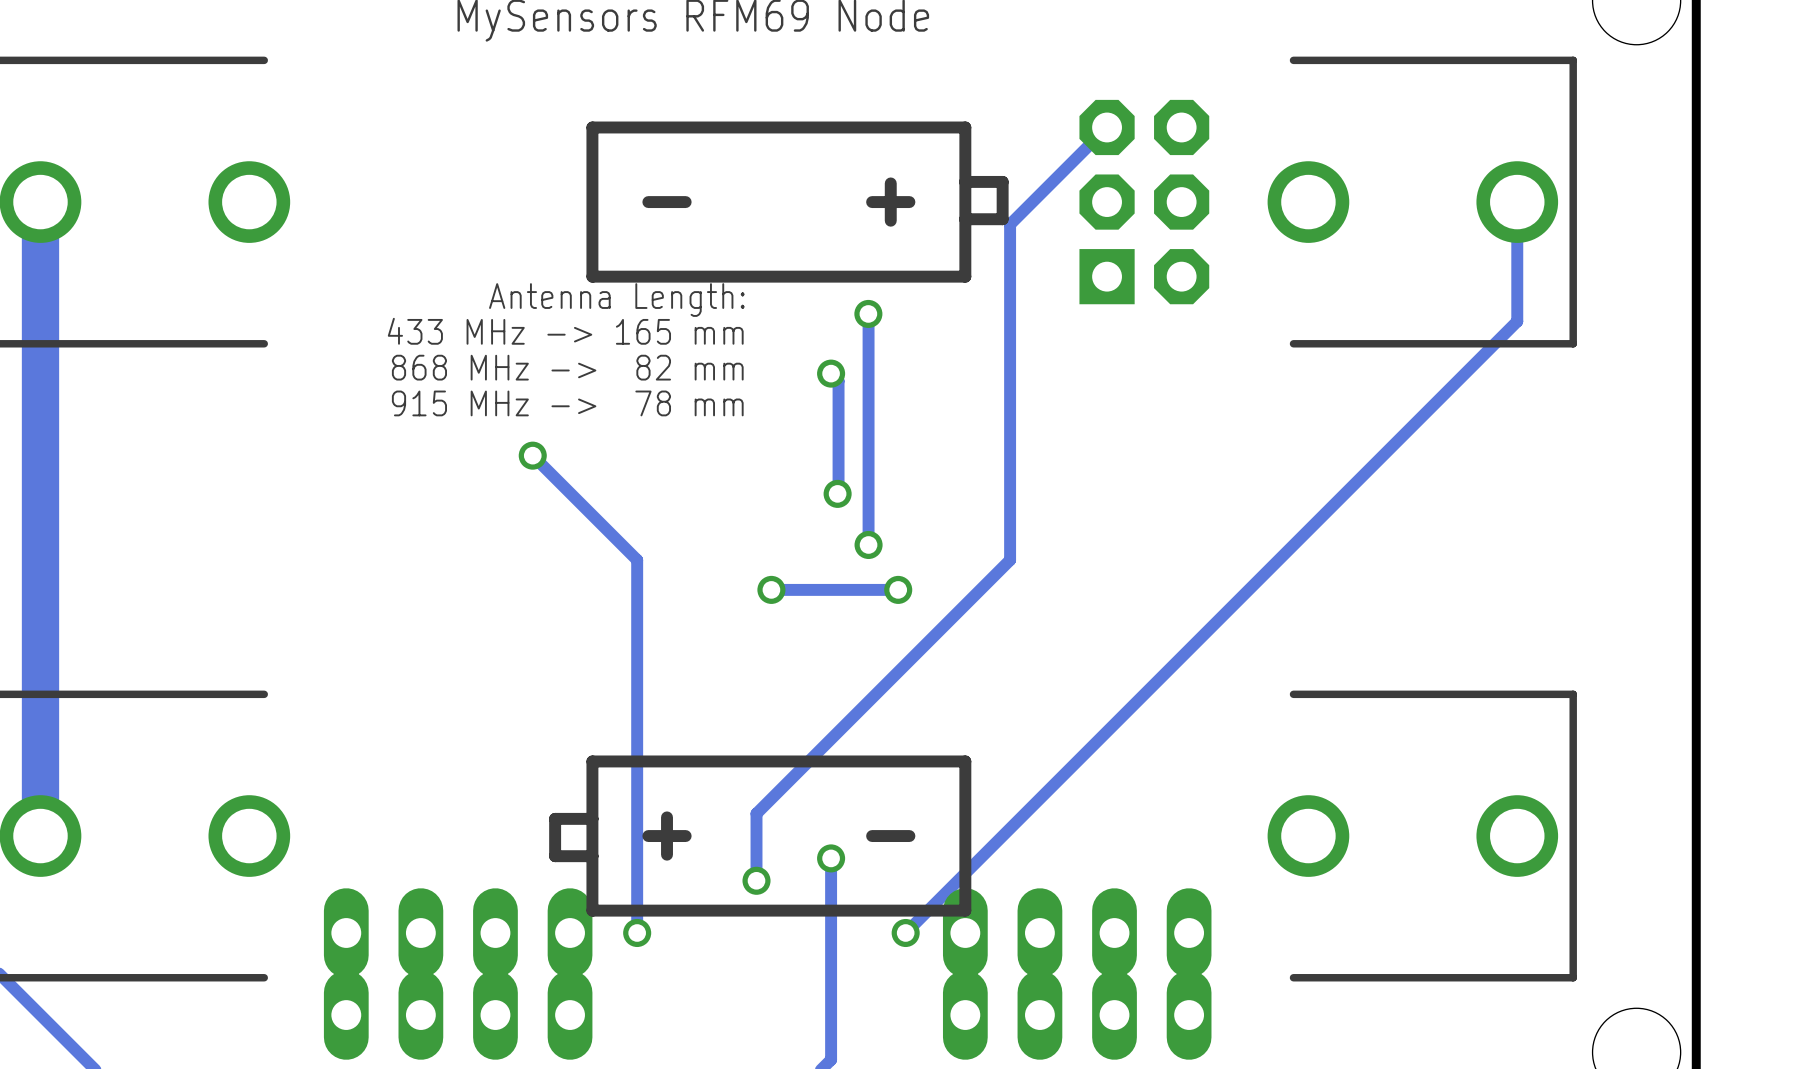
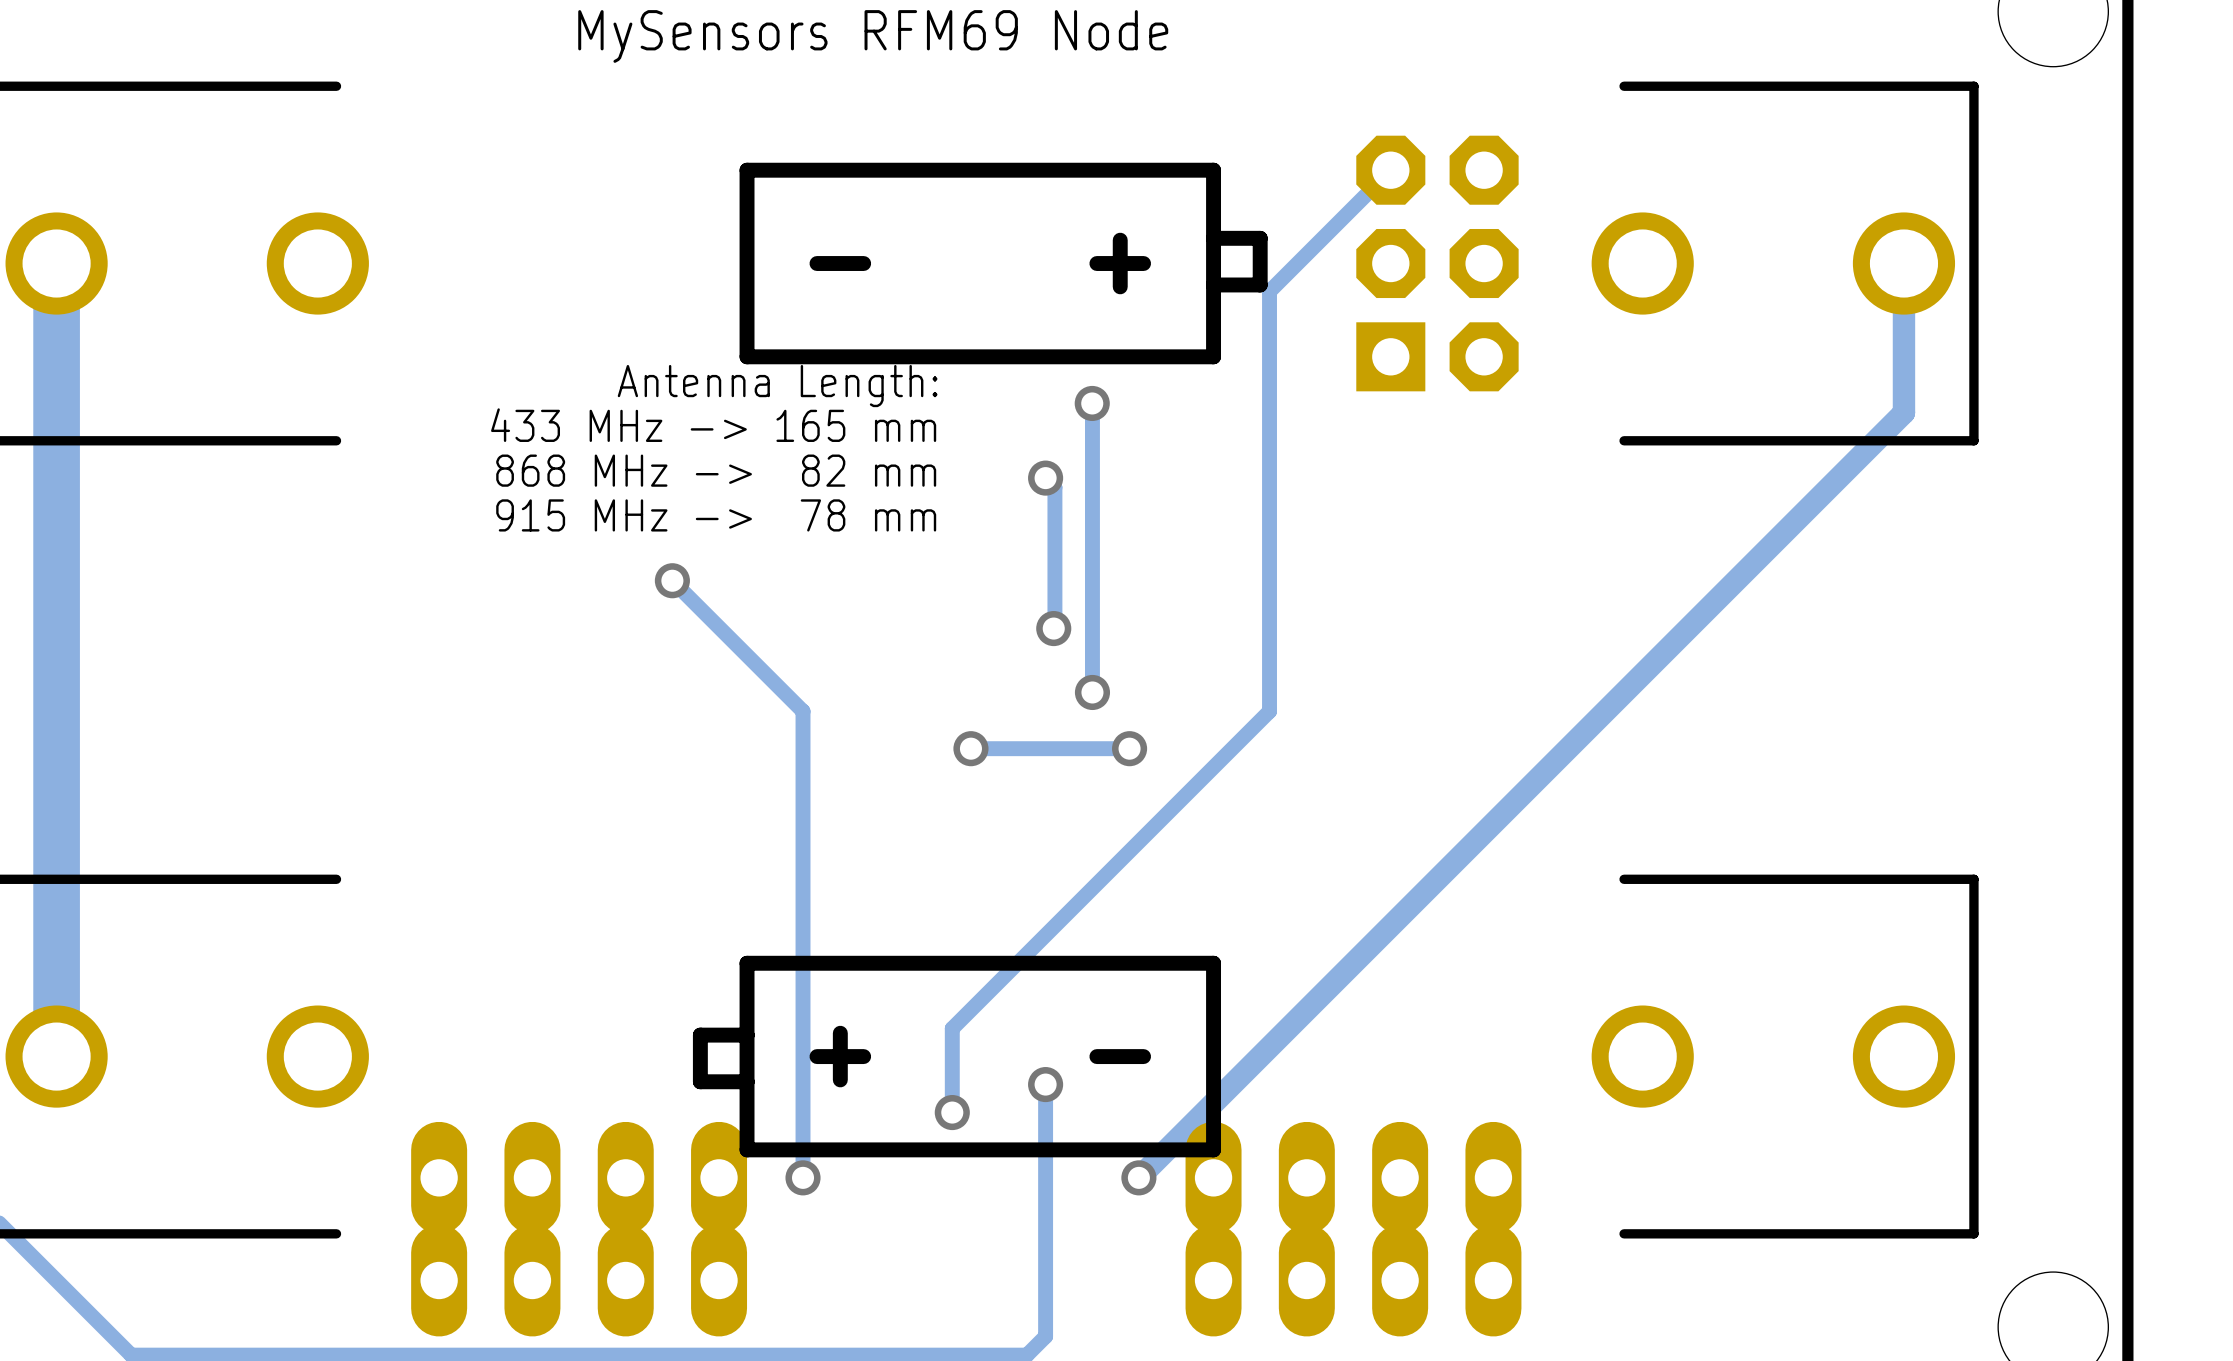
track width: thin (1517, 202) (1517, 321) (905, 932) -> thick (1903, 263) (1903, 412) (1138, 1177)

